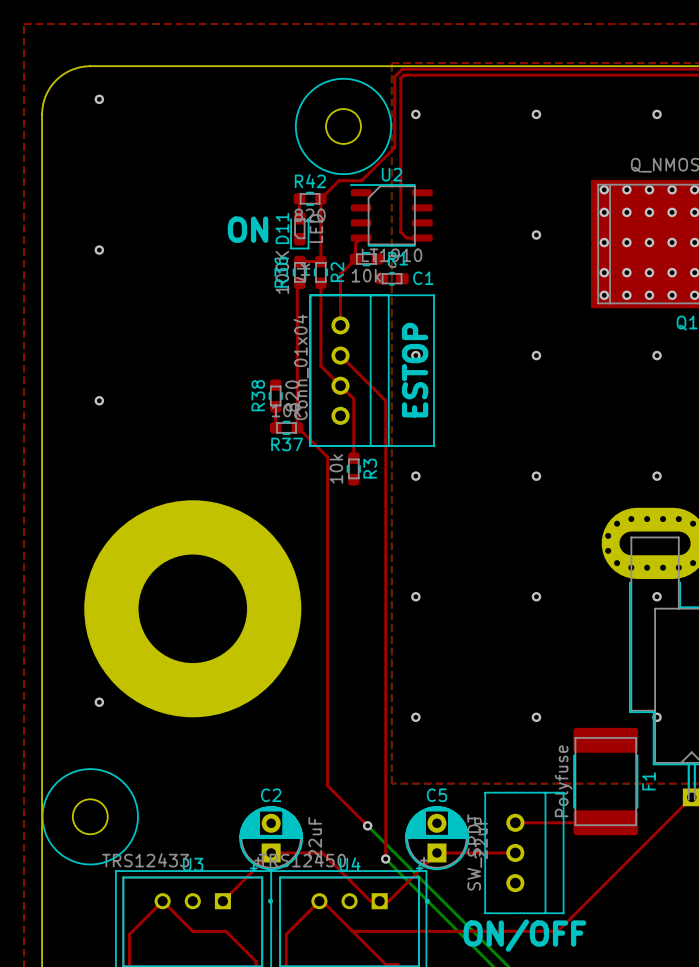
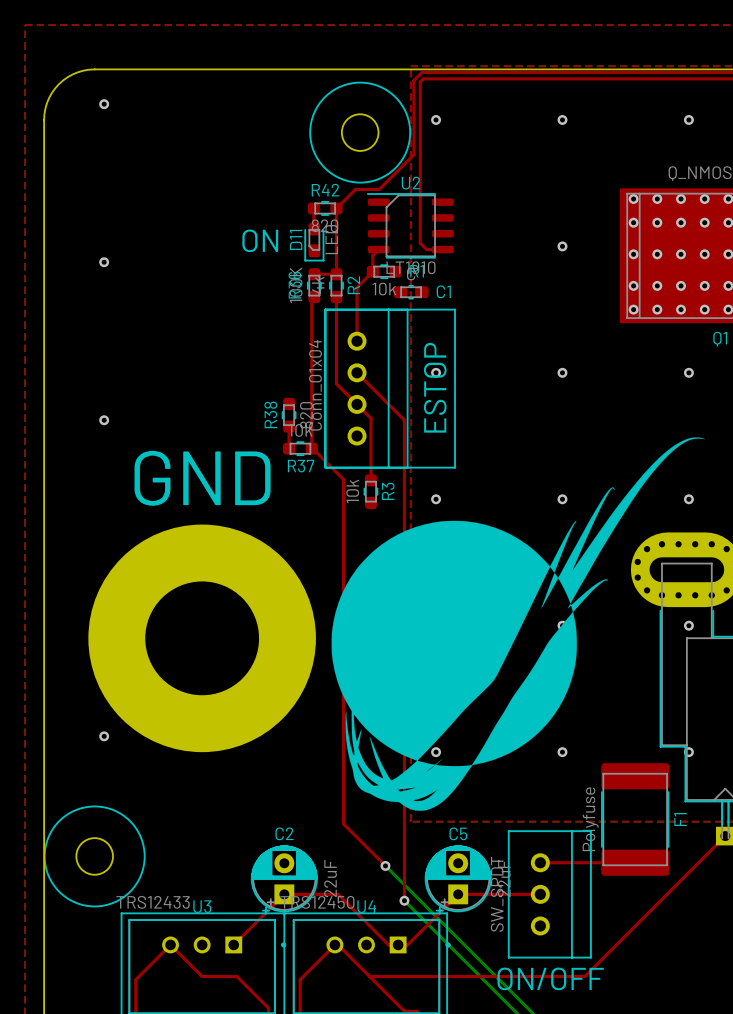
drawing: none -> [331, 437, 705, 811]
text: none -> GND (202, 478)

